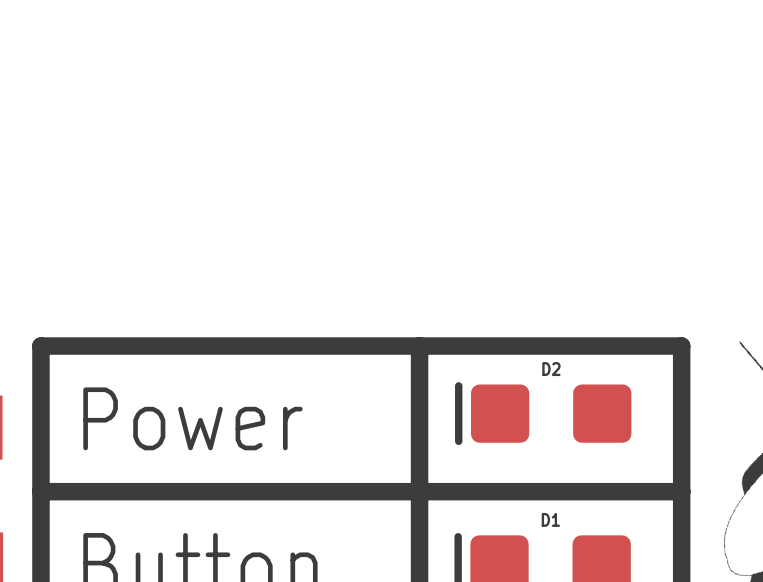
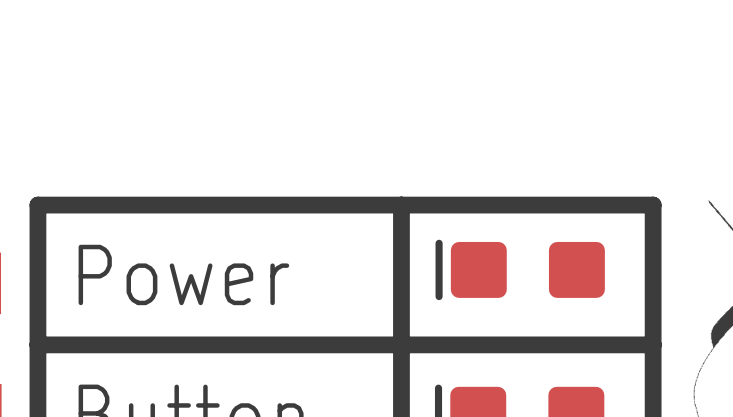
D2 name: D2 (551, 369) -> none
D1 name: D1 (550, 519) -> none

